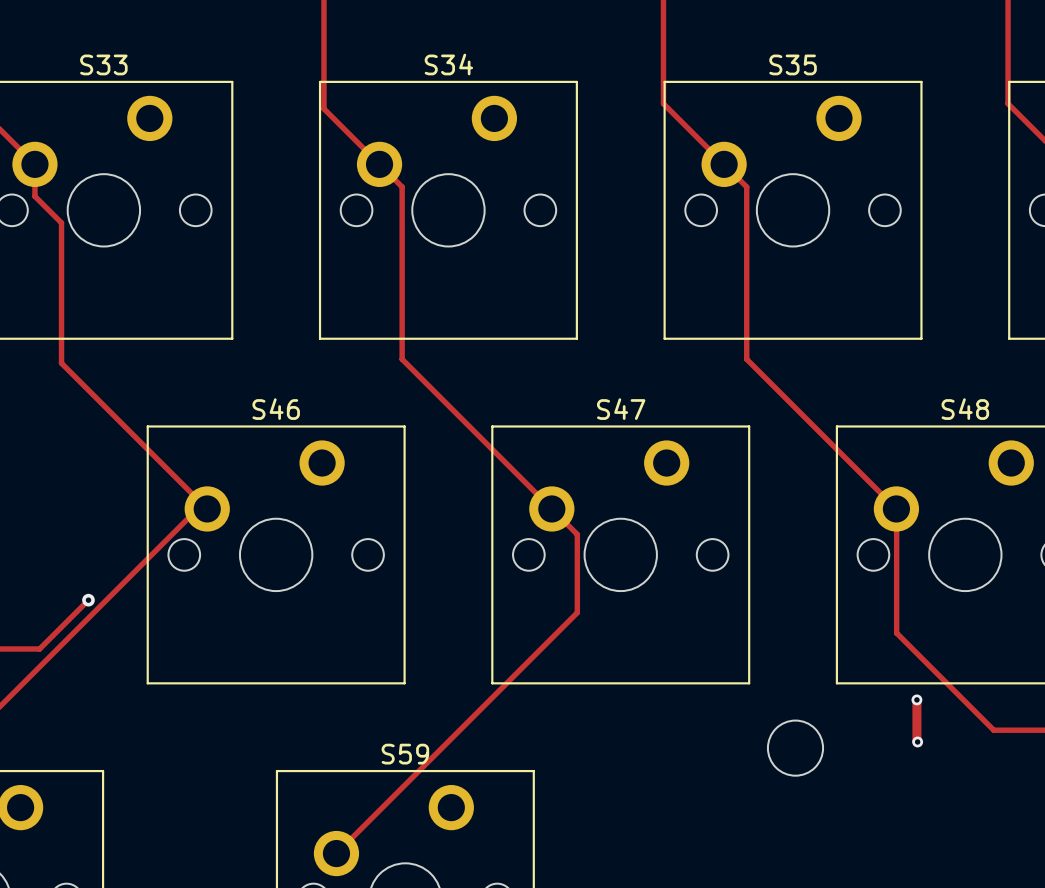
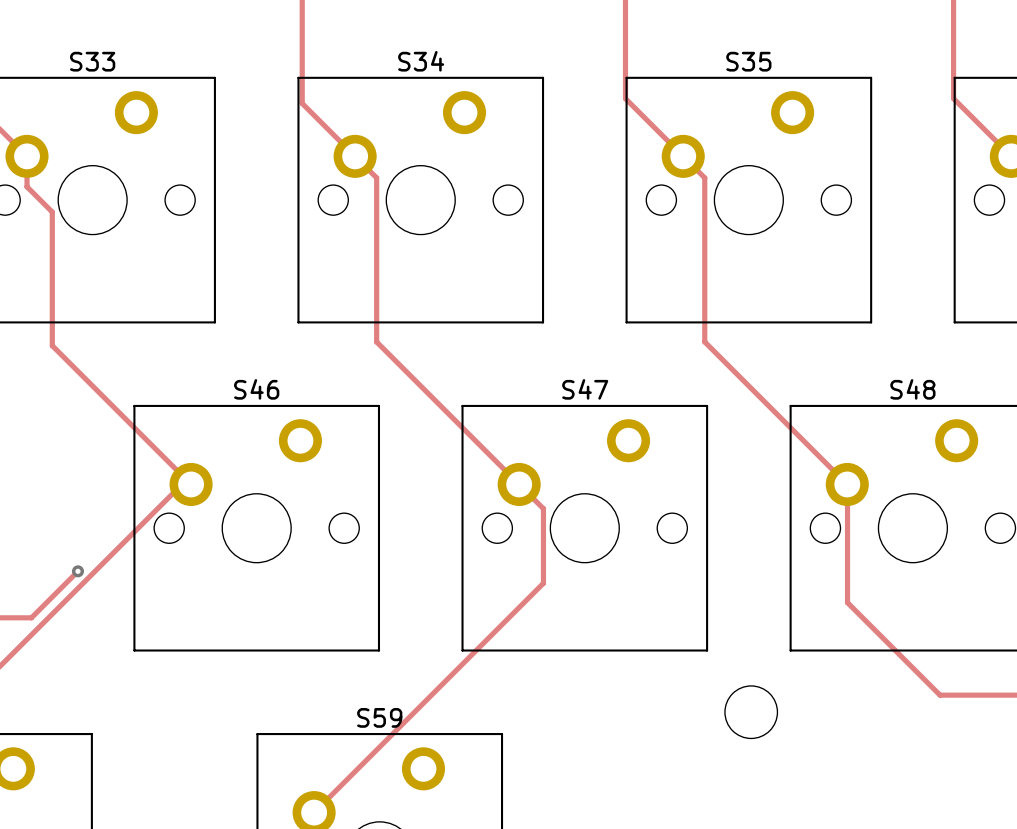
track: (916, 699) (917, 741) -> none
via: (916, 699) -> none
via: (917, 741) -> none

